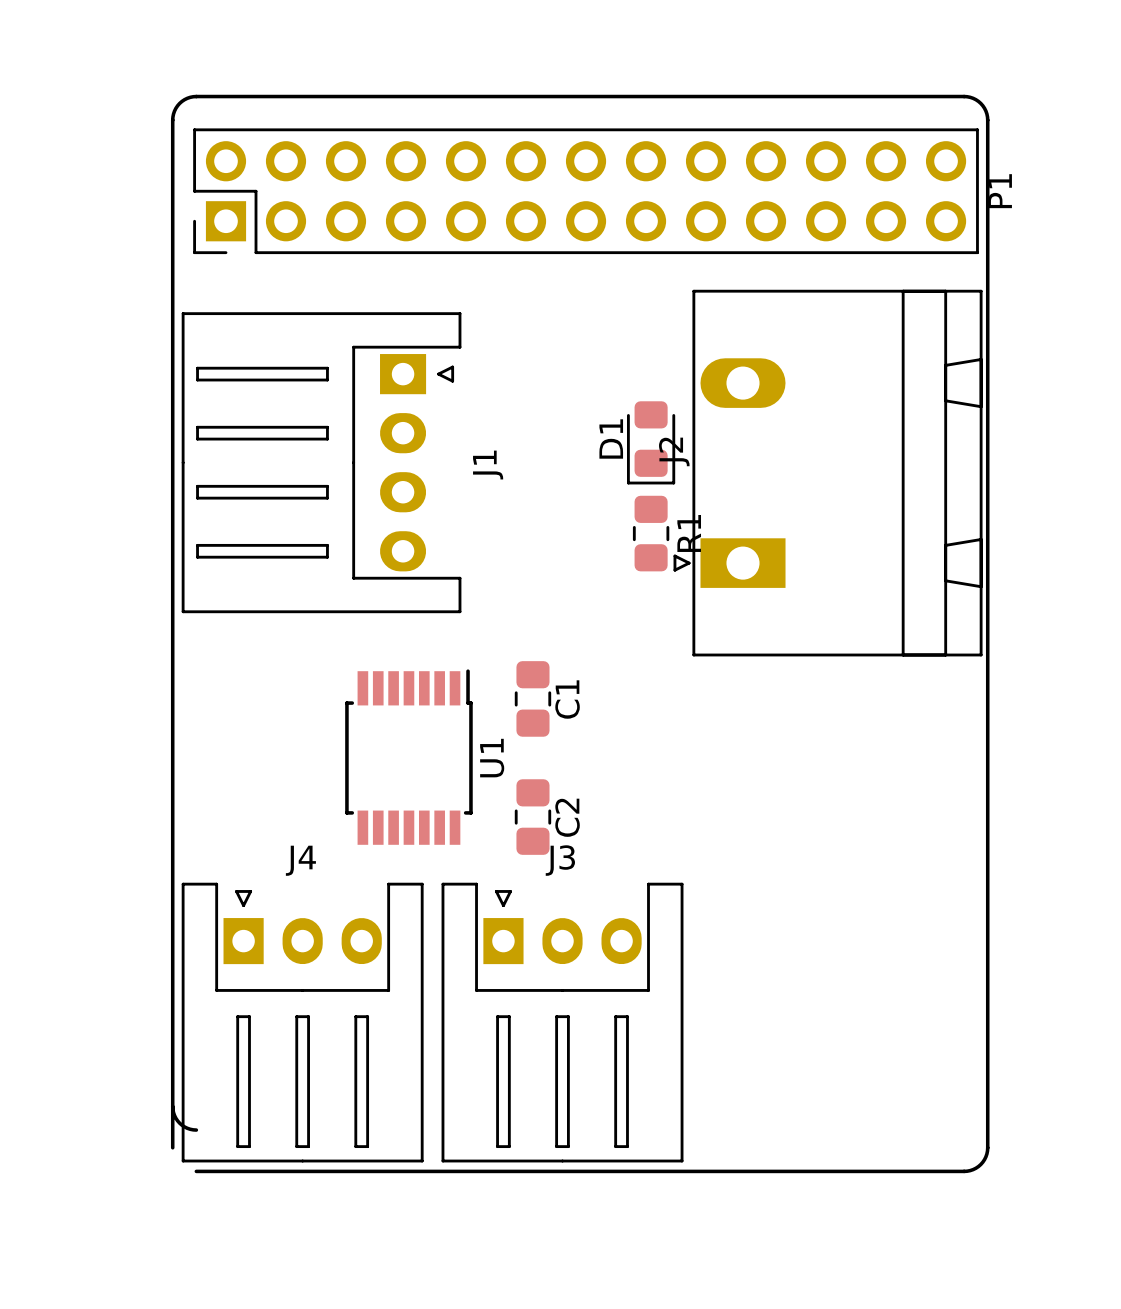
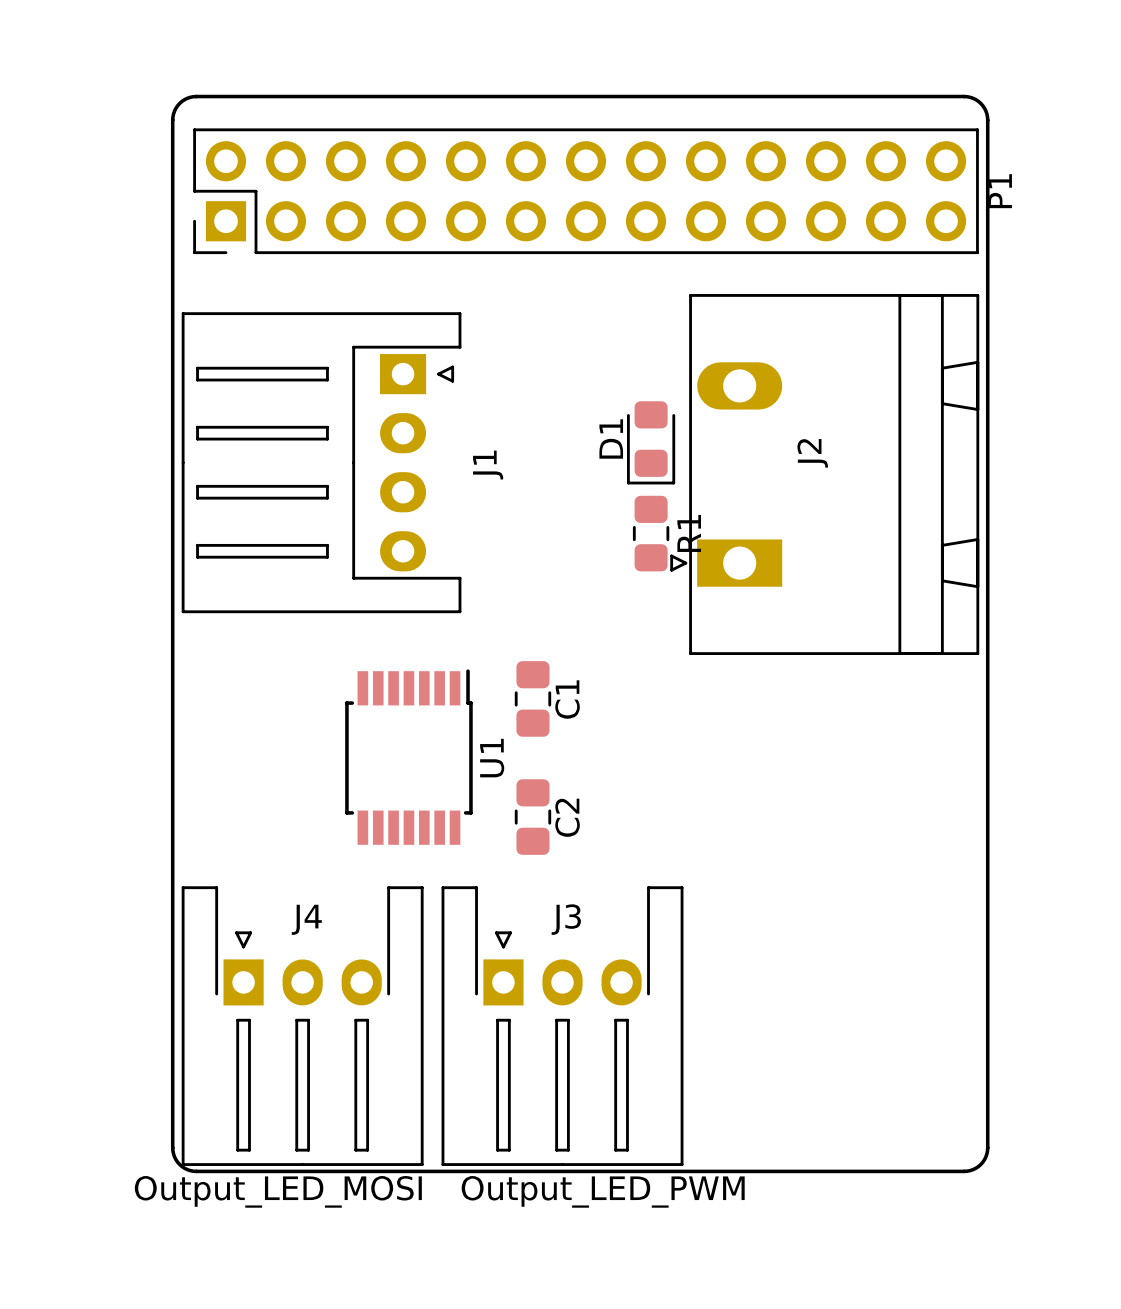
J2 footprint: [673, 289, 983, 657] -> [670, 294, 980, 655]
J2 name position: J2 (674, 451) -> J2 (812, 453)
J4 name position: J4 (300, 860) -> J4 (306, 919)
J3 name position: J3 (560, 860) -> J3 (566, 919)
J4 footprint: [181, 882, 424, 1163] -> [181, 886, 424, 1166]
J3 footprint: [441, 882, 684, 1163] -> [441, 886, 684, 1166]
board edge: (172, 1106) (174, 1115) (179, 1123) (187, 1128) (196, 1130) -> (172, 1147) (174, 1156) (179, 1164) (187, 1169) (196, 1171)
J4 value: none -> Output_LED_MOSI (278, 1191)
J3 value: none -> Output_LED_PWM (603, 1191)

